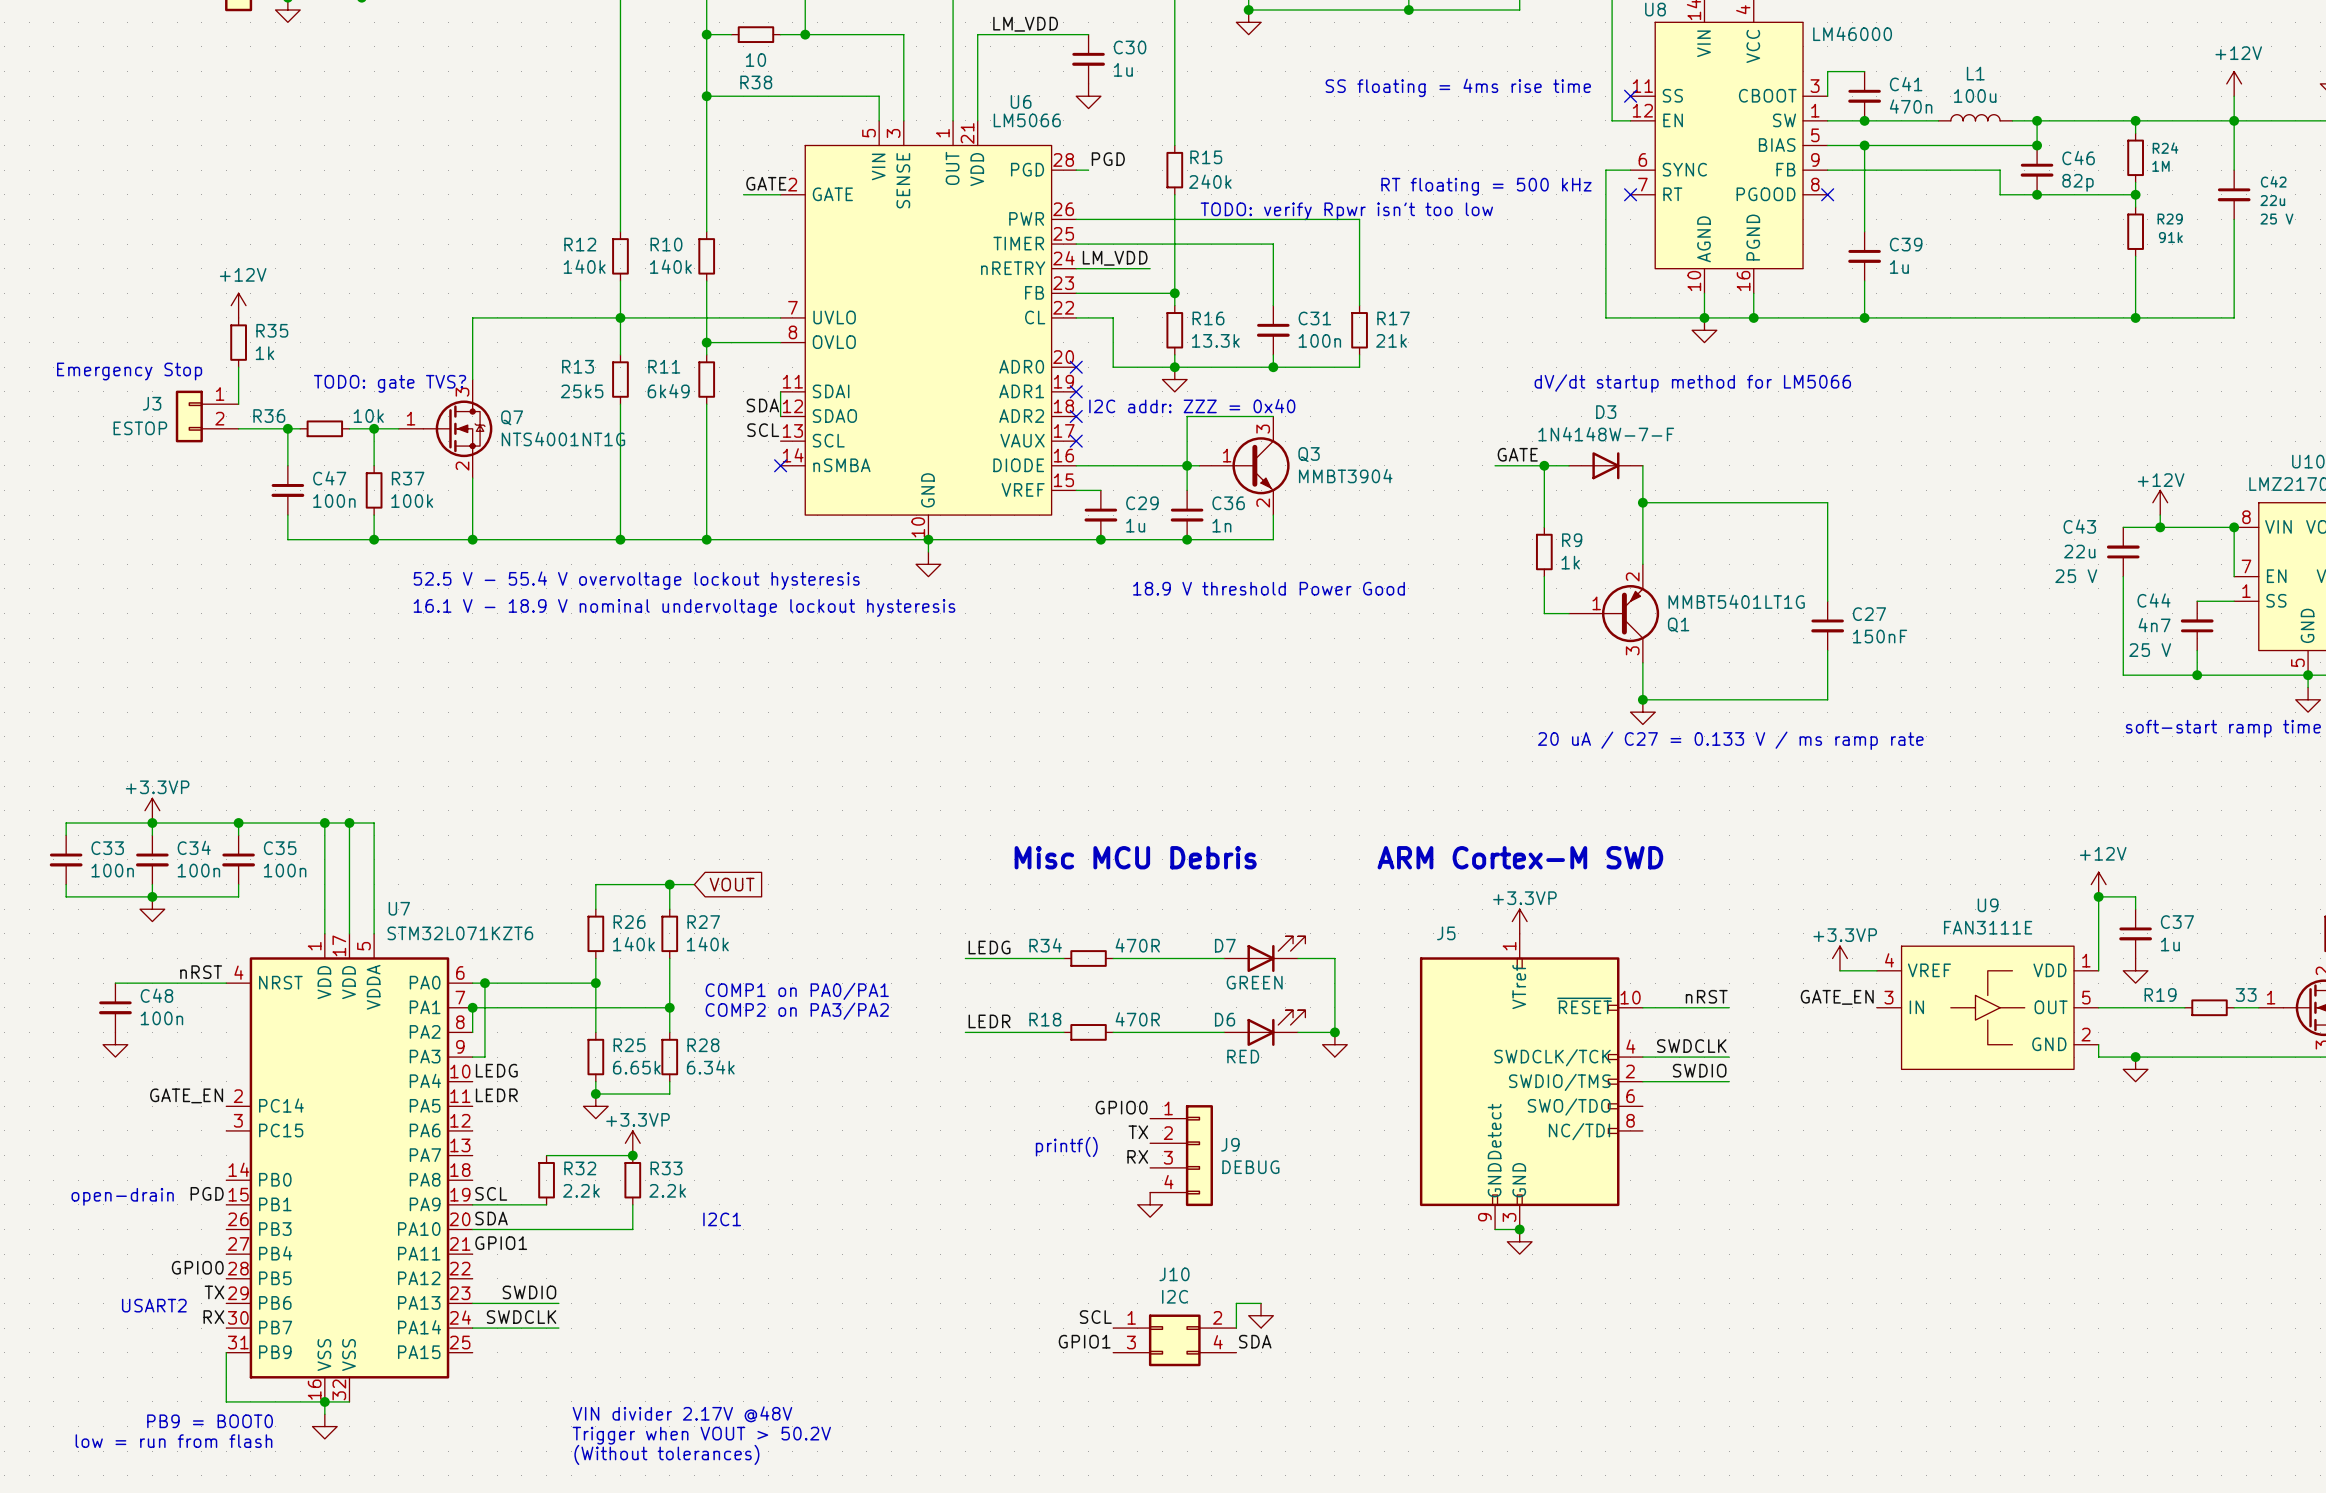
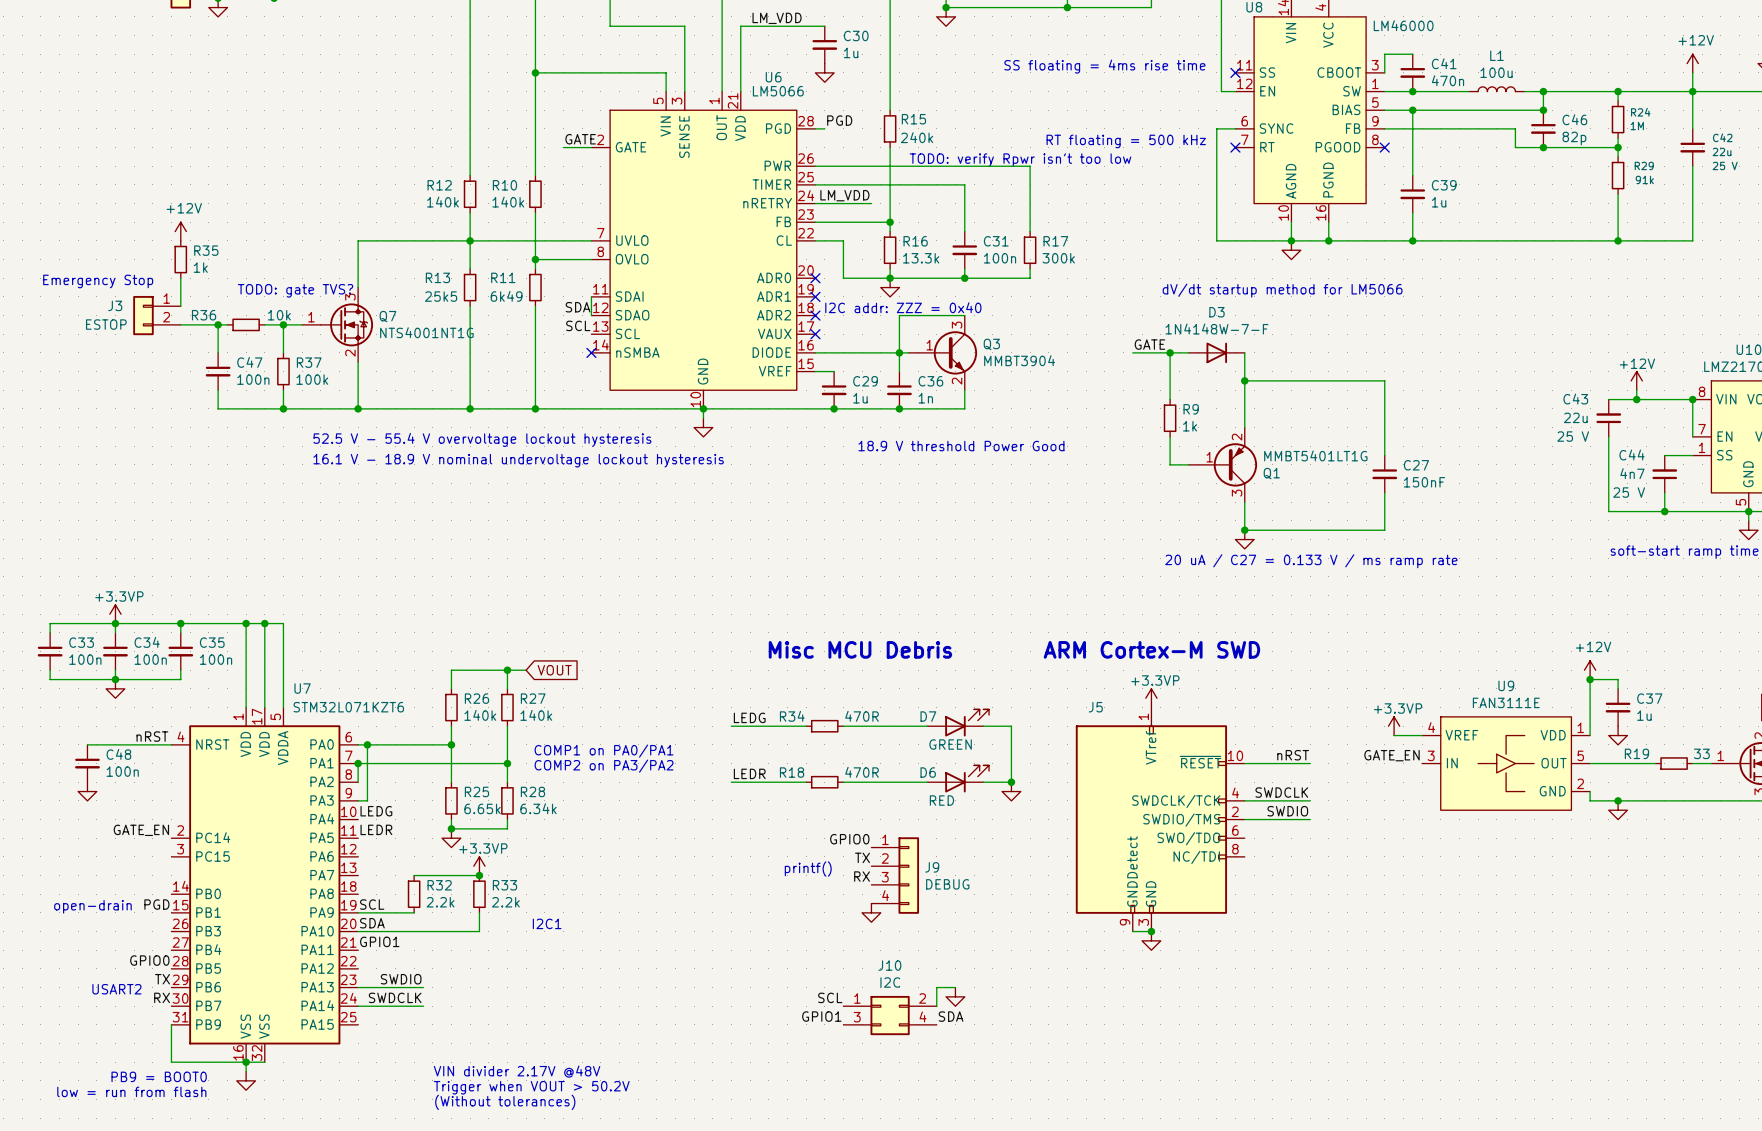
wire: (706, 34) (731, 34) -> none
junction: (706, 34) -> none
R38: 10 (755, 34) -> none
wire: (780, 34) (805, 34) -> none
junction: (805, 34) -> none
R17 value: 21k (1391, 340) -> 300k (1058, 258)

